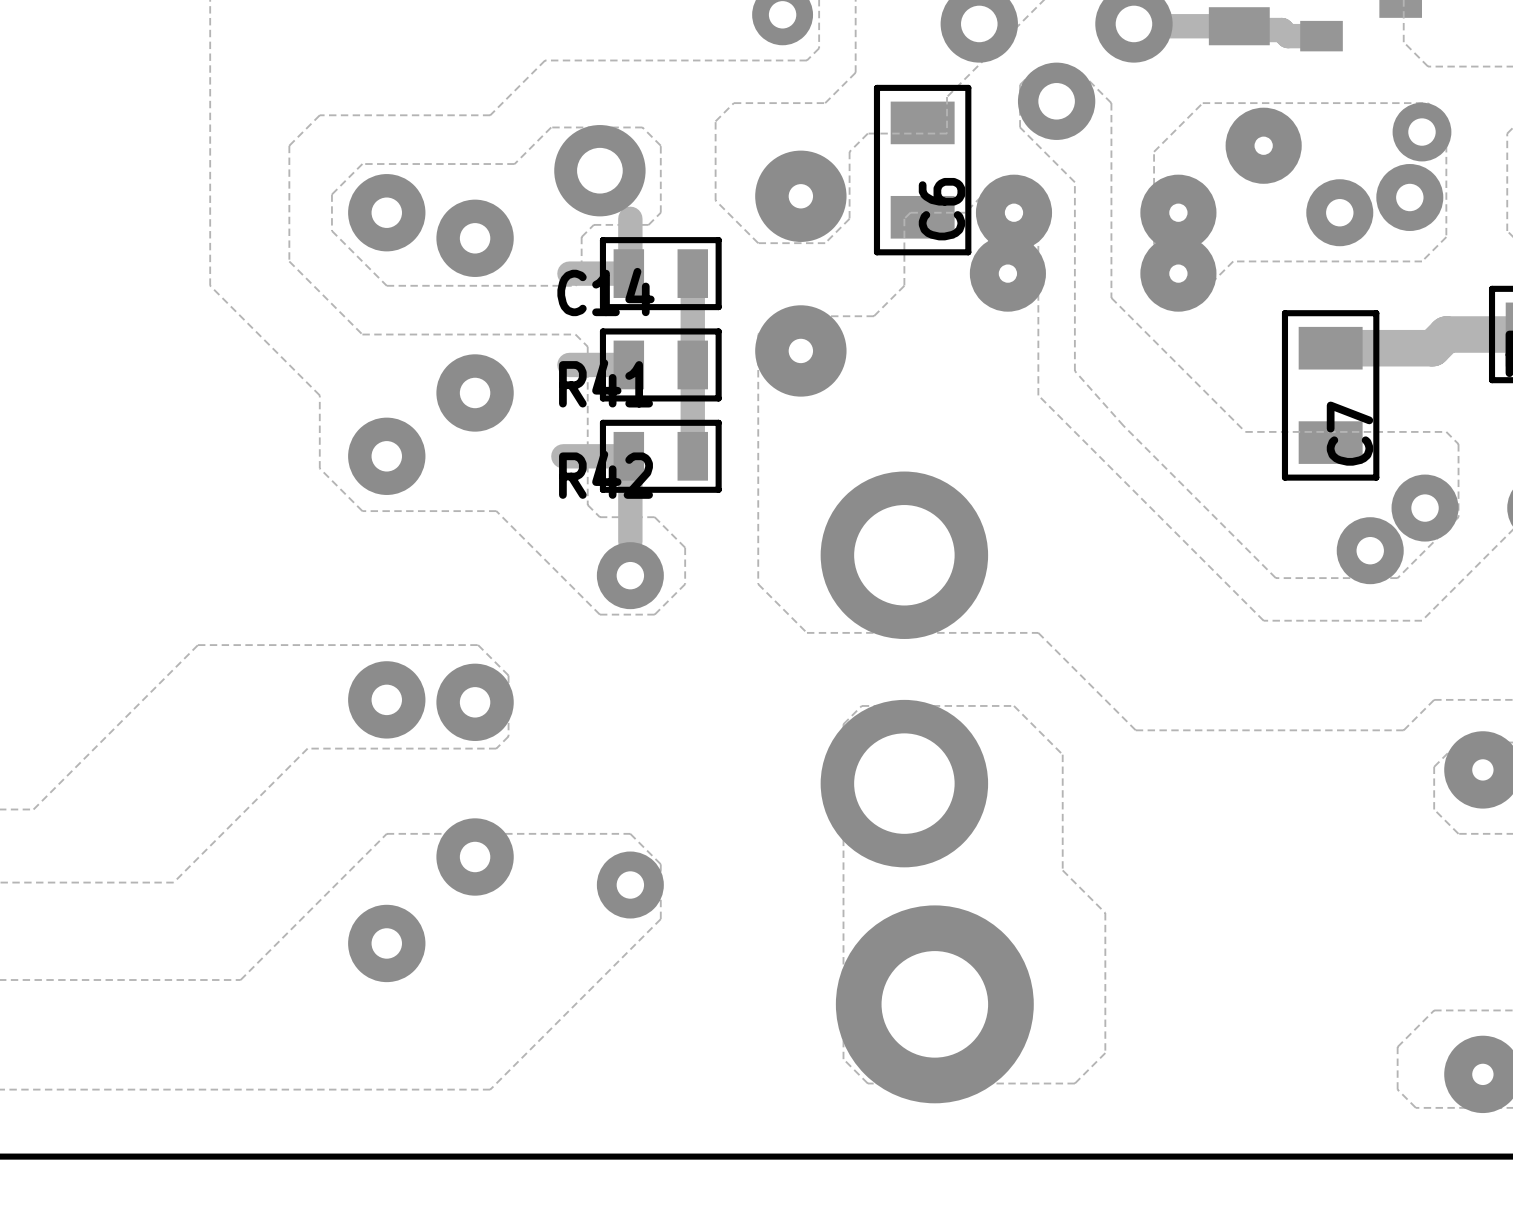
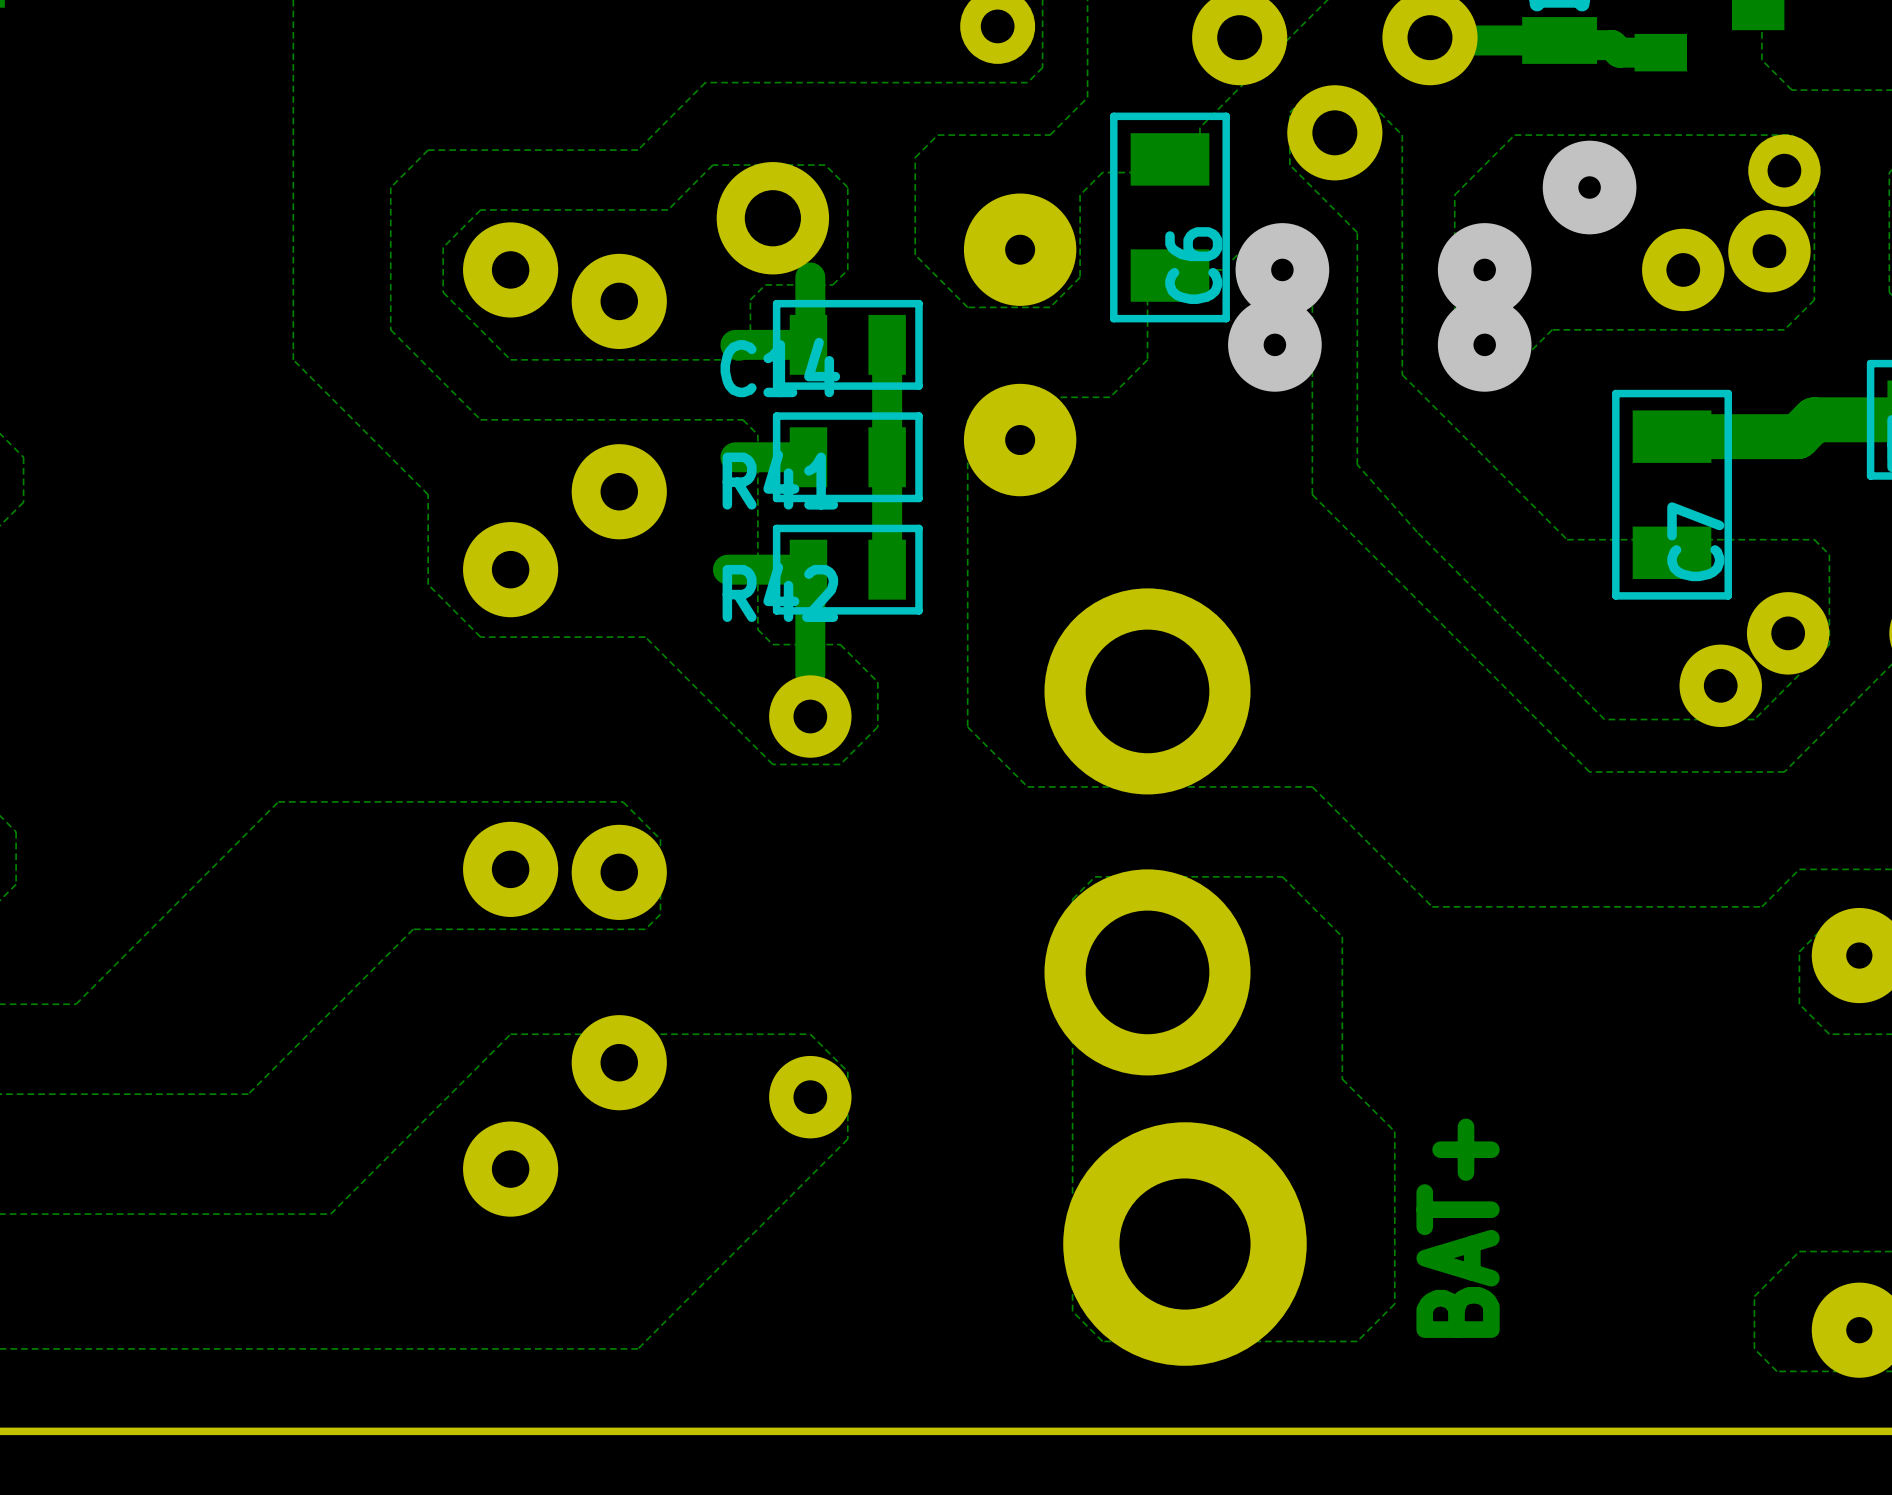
text: none -> BAT+ (1458, 1228)

